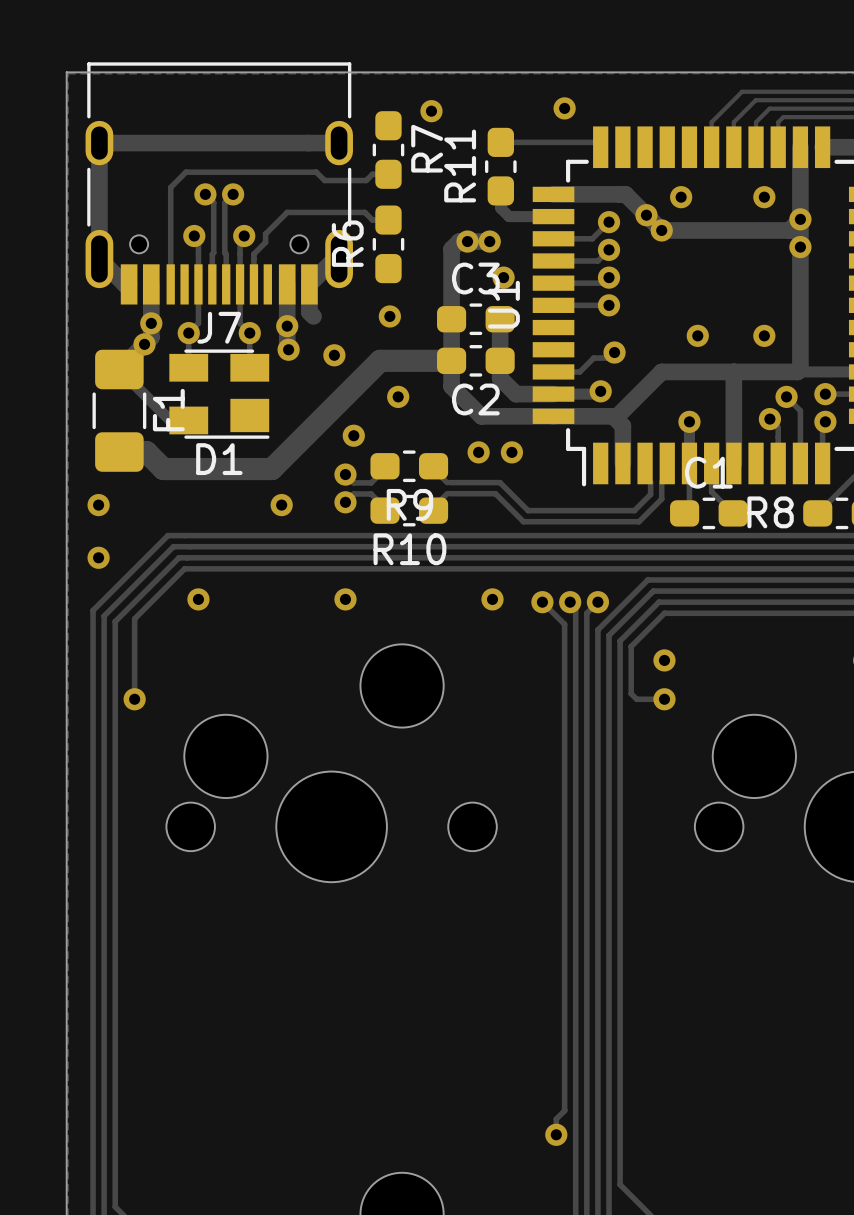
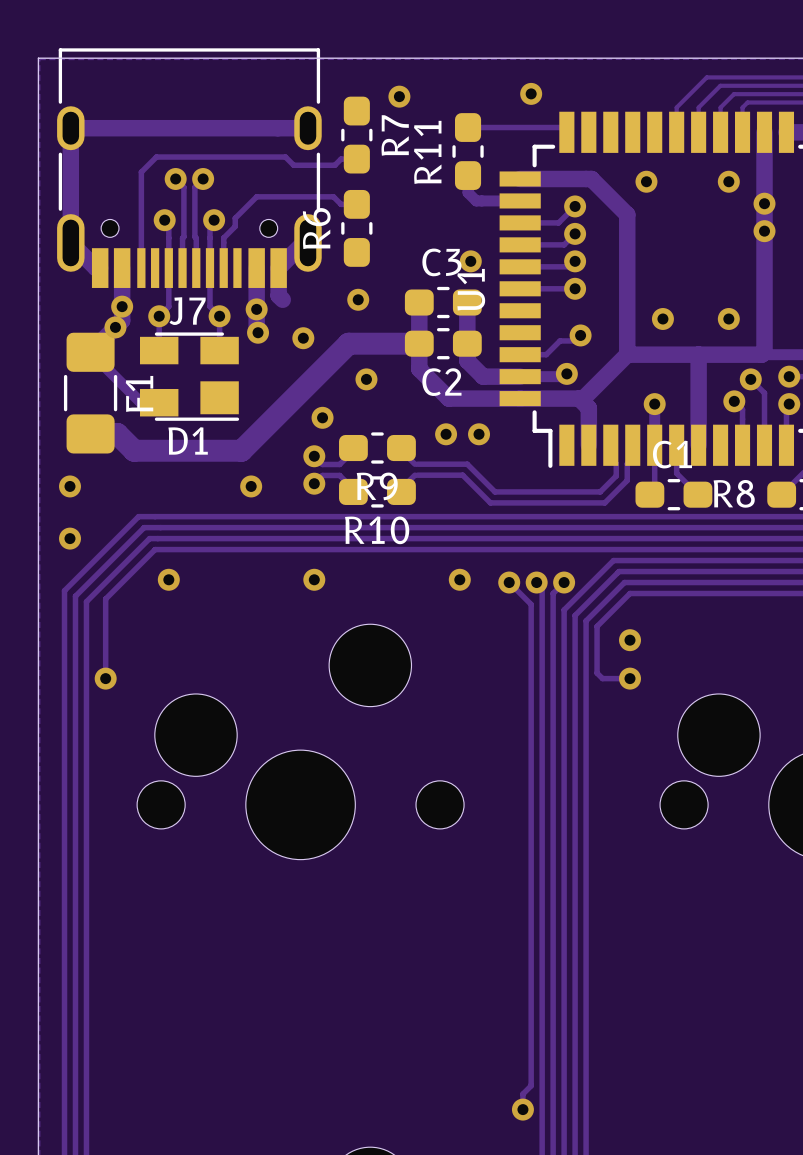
via: (646, 215) -> none
track: (800, 219) (789, 230) (661, 230) -> (627, 354) (627, 214)
via: (661, 230) -> none
via: (467, 241) -> none
track: (489, 241) (459, 241) (451, 249) (451, 319) -> none
via: (489, 241) -> none

